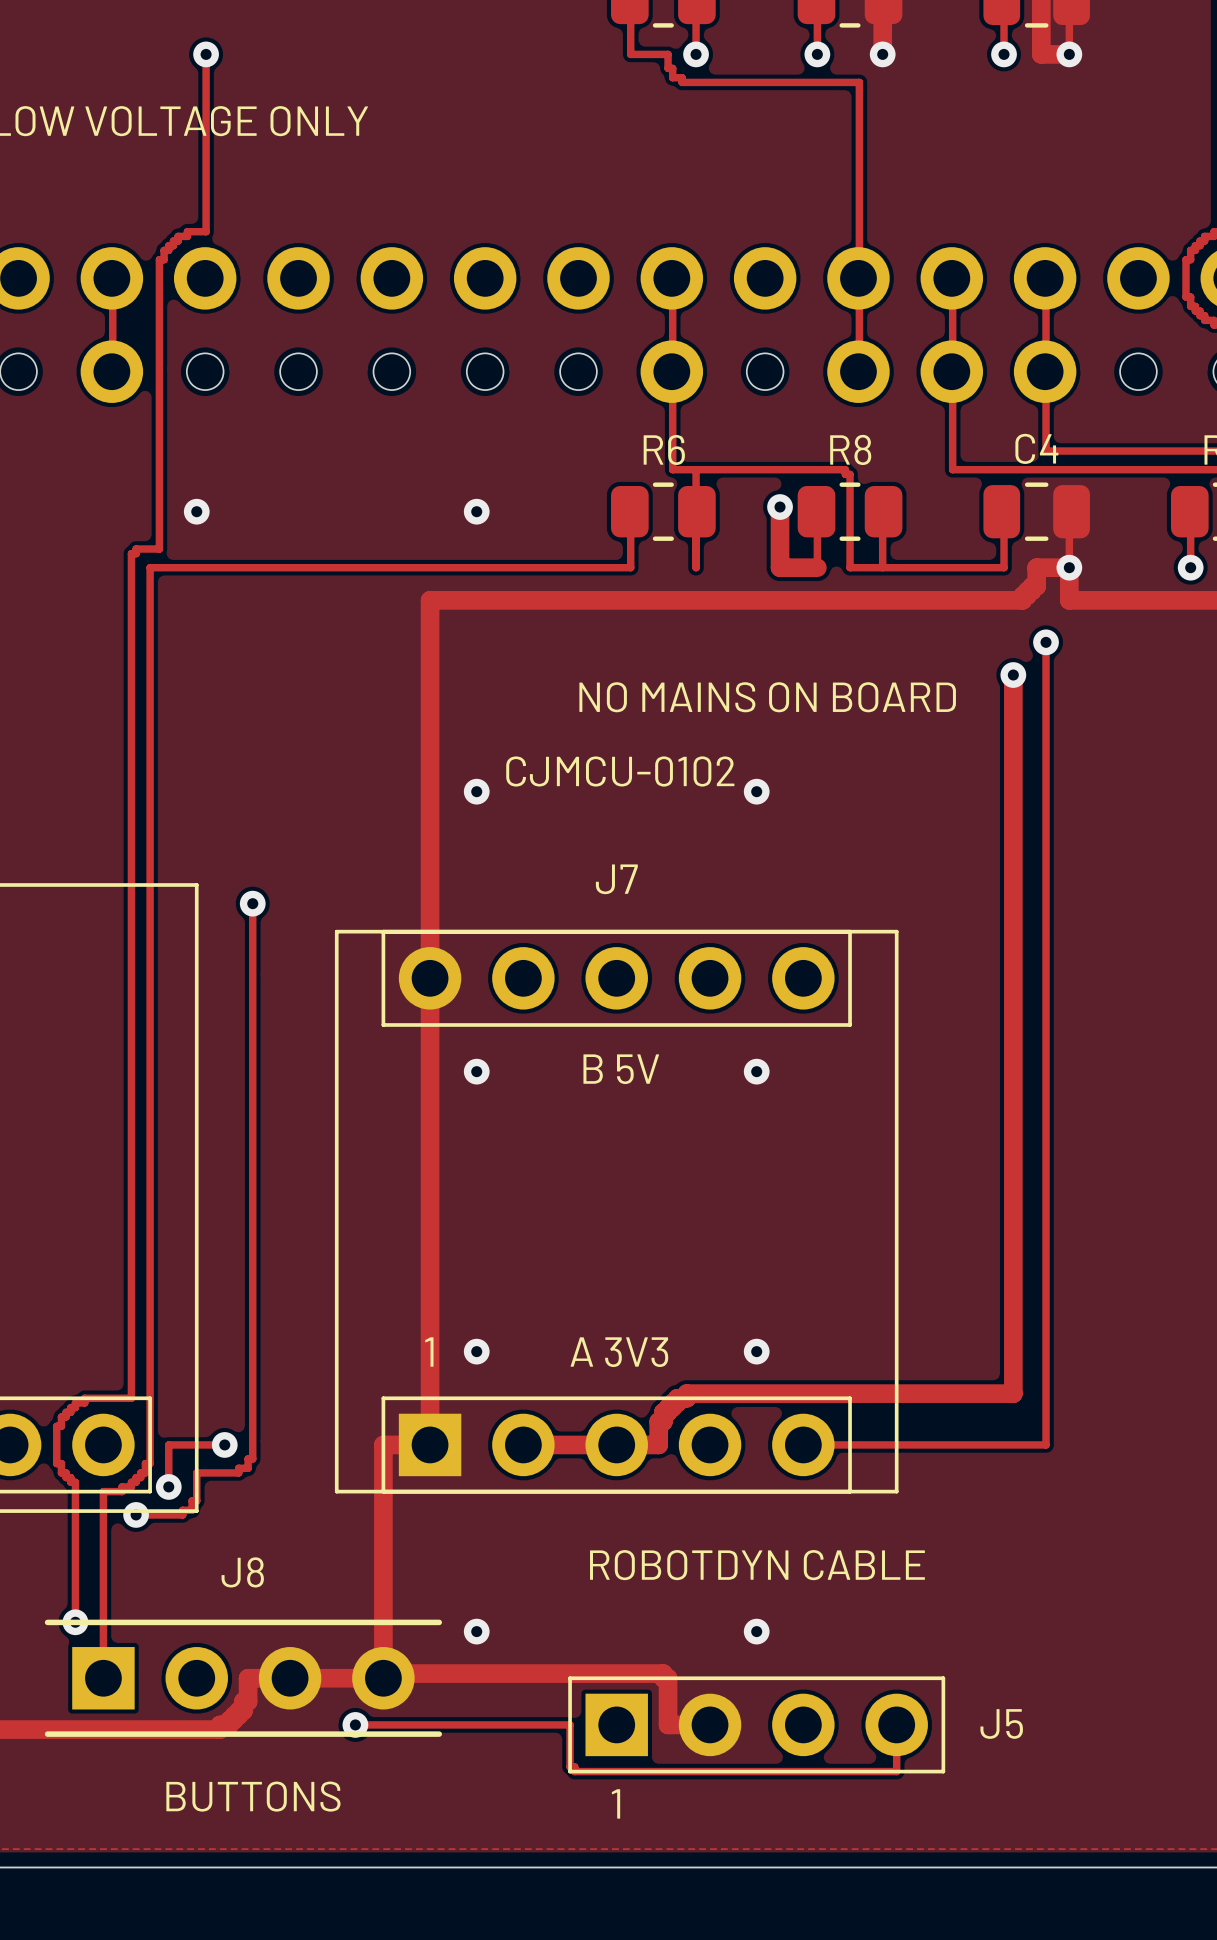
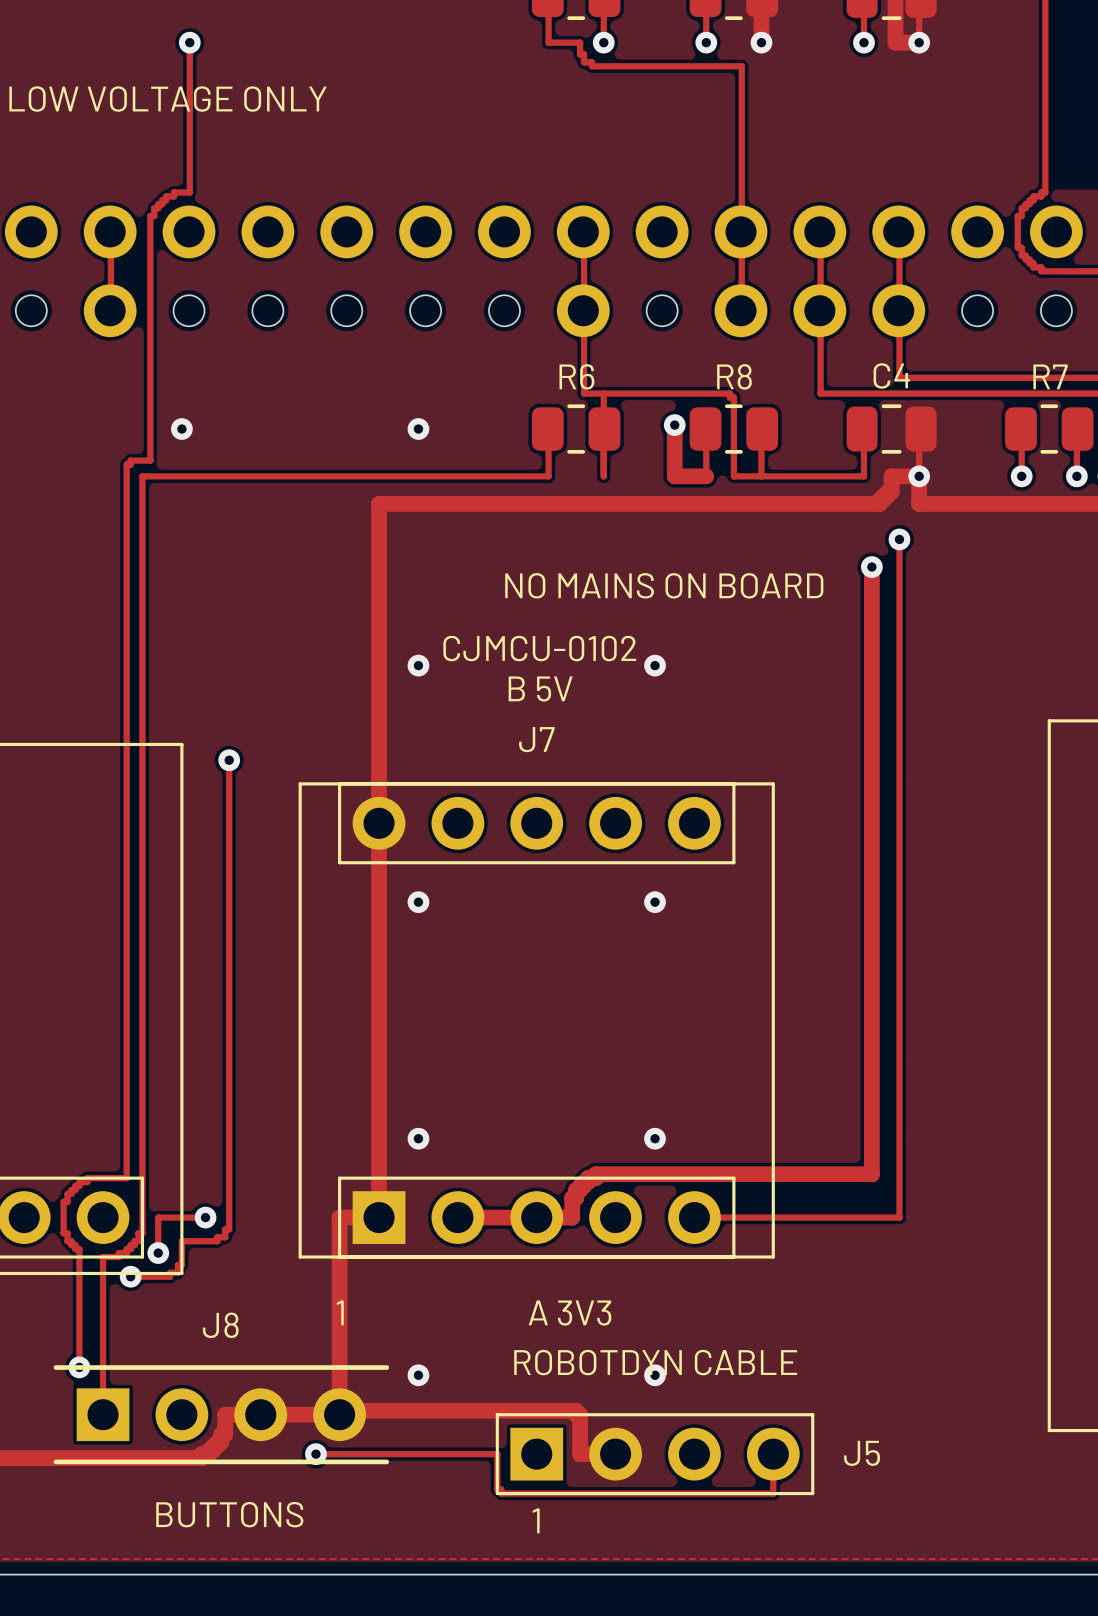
J7 text position: B 5V (621, 1069) -> B 5V (540, 689)
J7 text position: 1 (429, 1351) -> 1 (340, 1312)
J7 text position: A 3V3 (619, 1352) -> A 3V3 (570, 1313)
text position: ROBOTDYN CABLE (757, 1565) -> ROBOTDYN CABLE (655, 1362)

